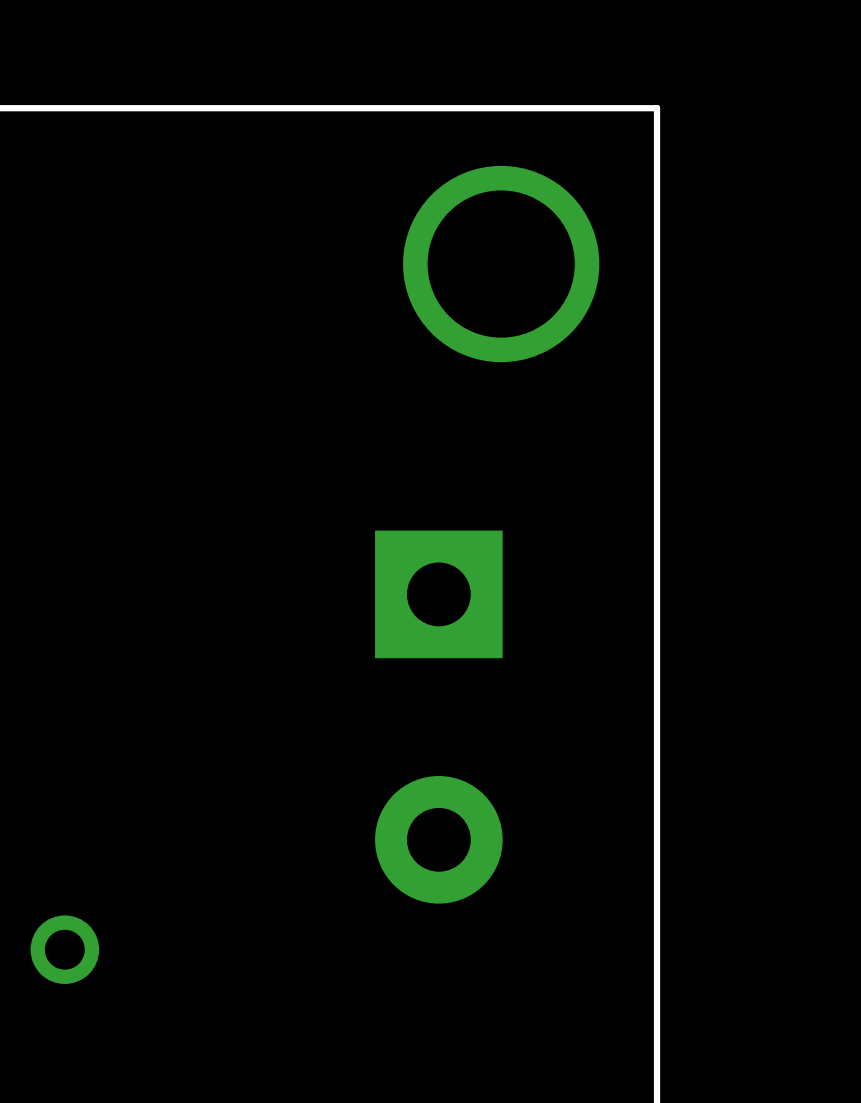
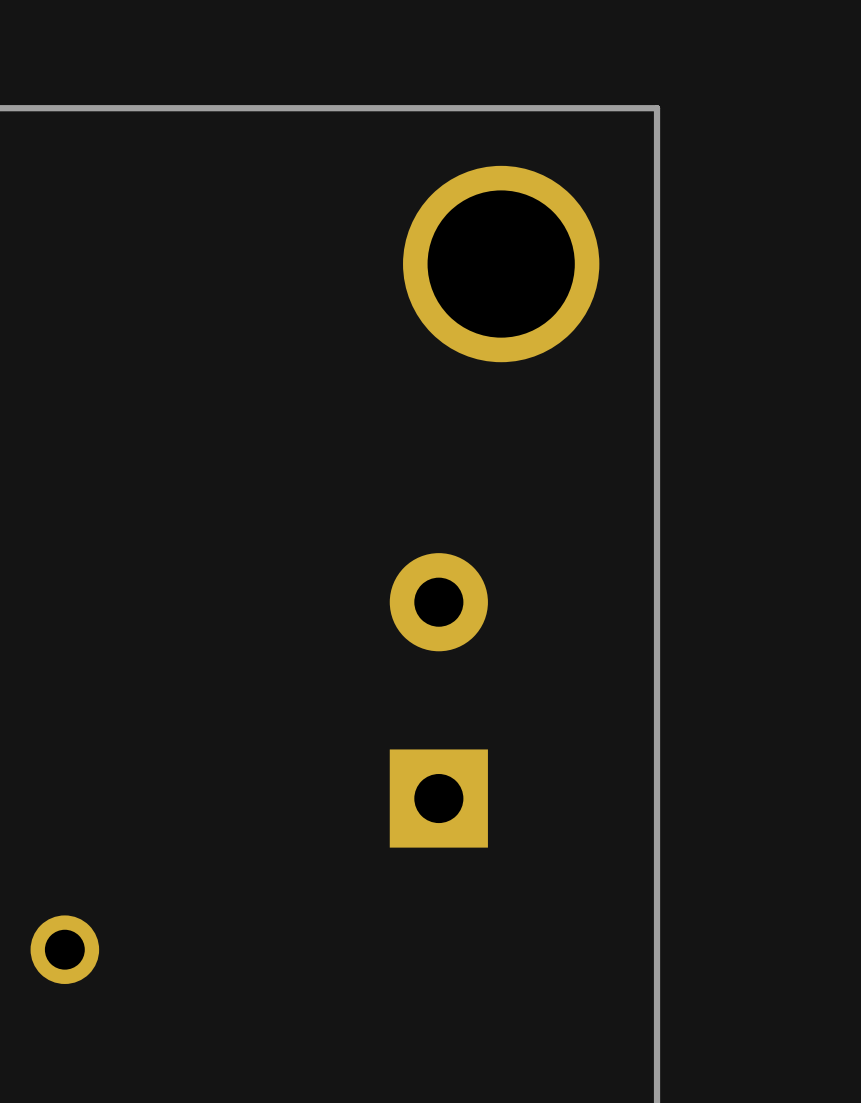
part footprint: [375, 530, 503, 904] -> [389, 553, 488, 848]

